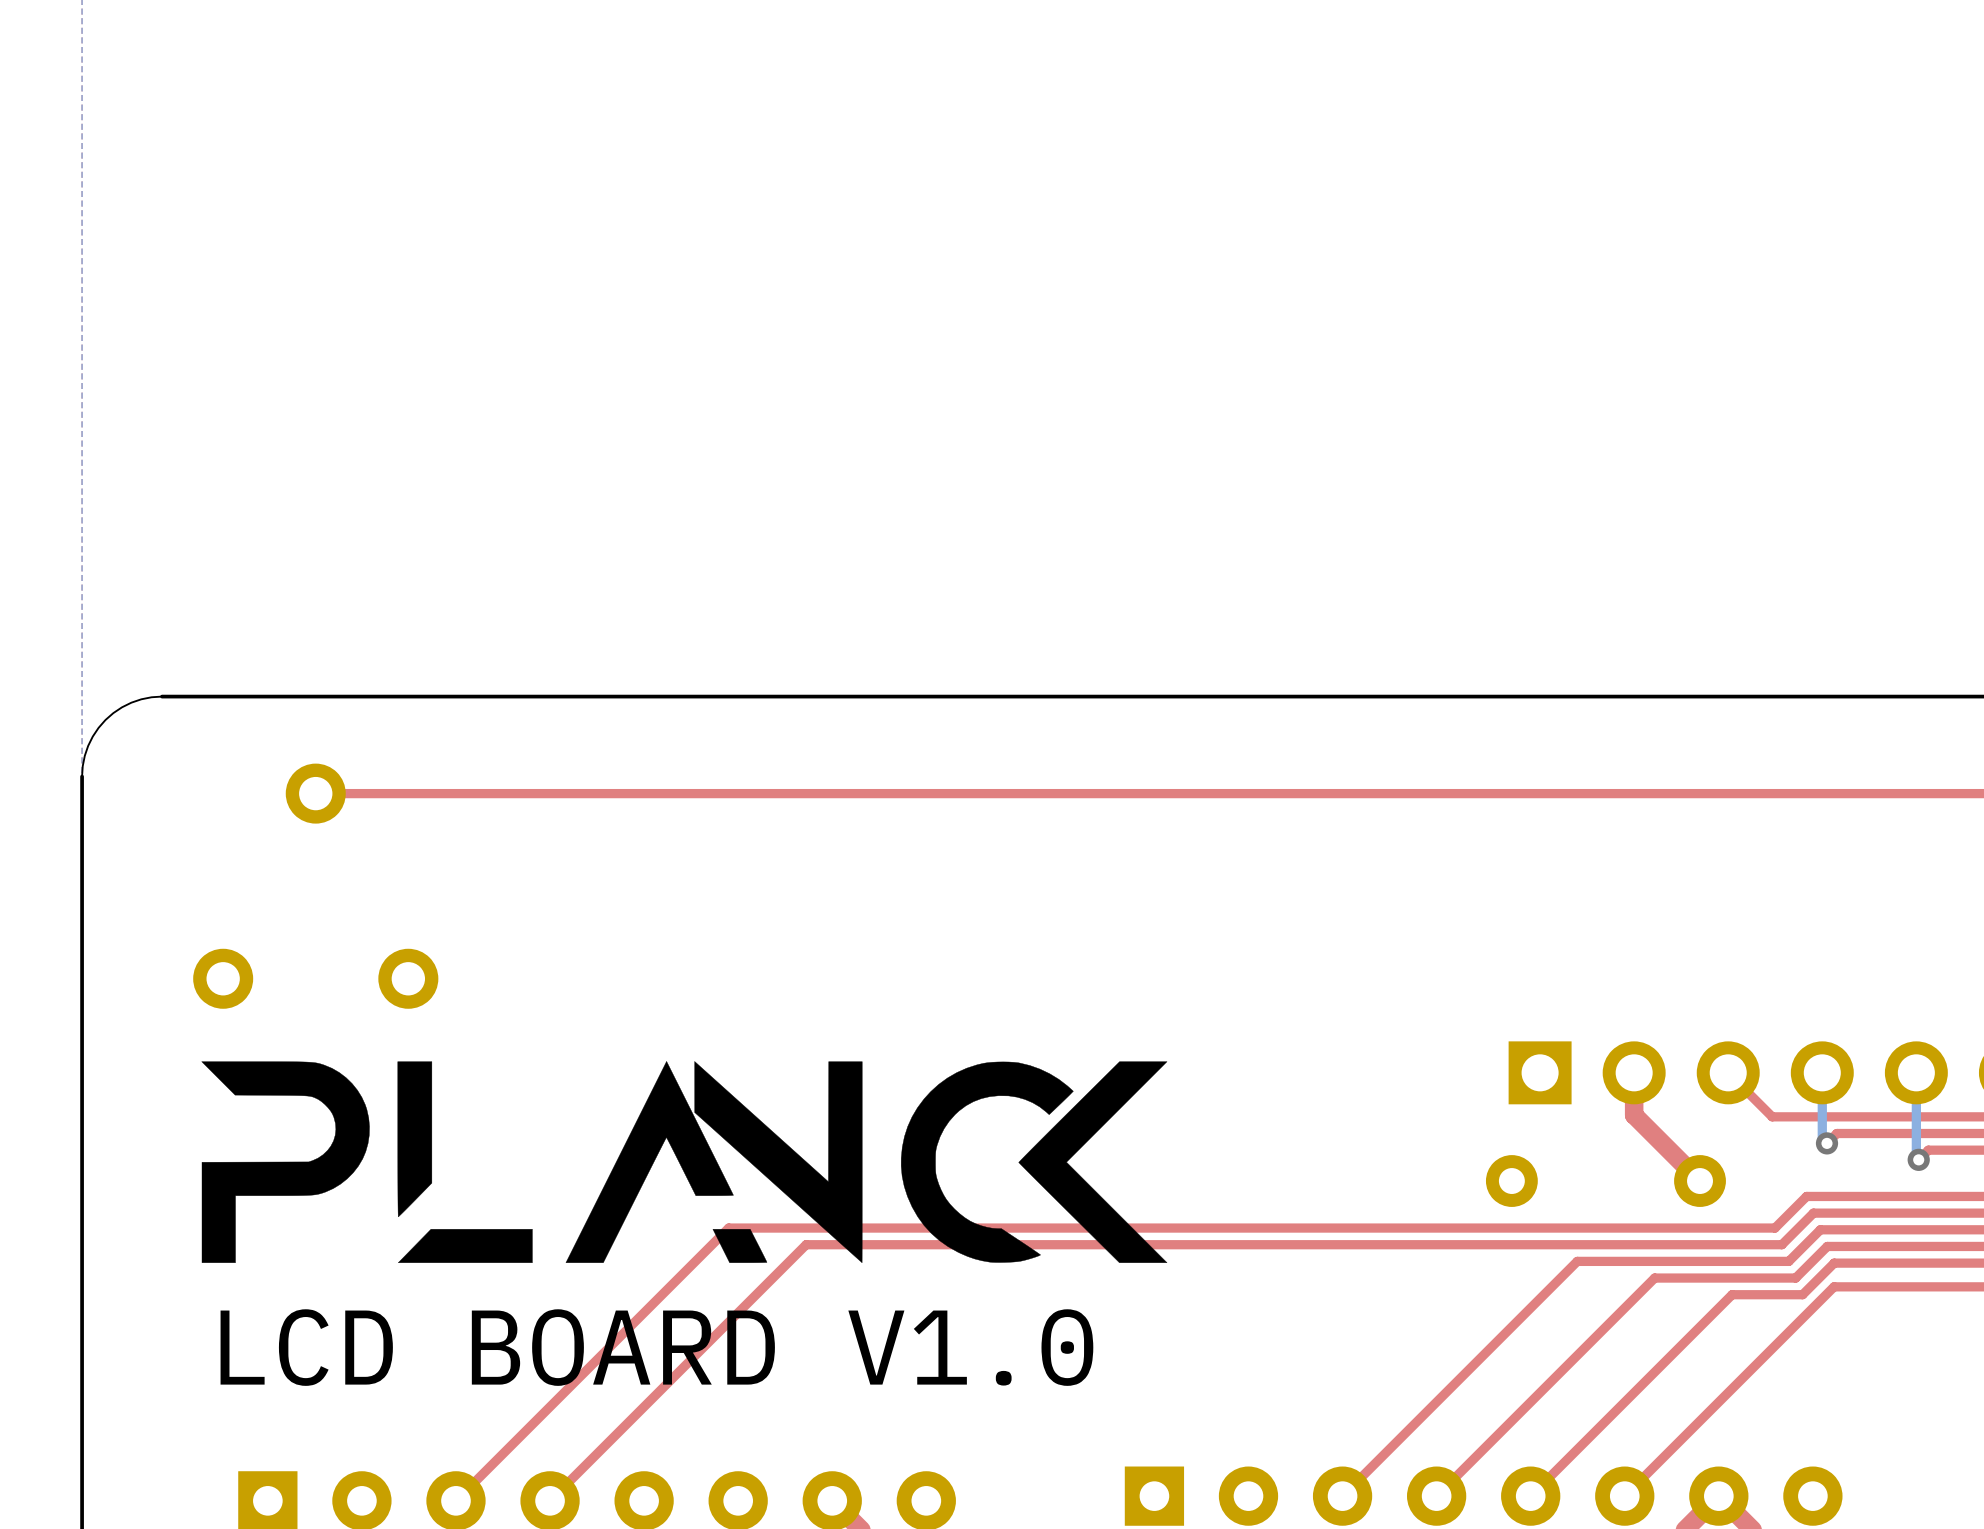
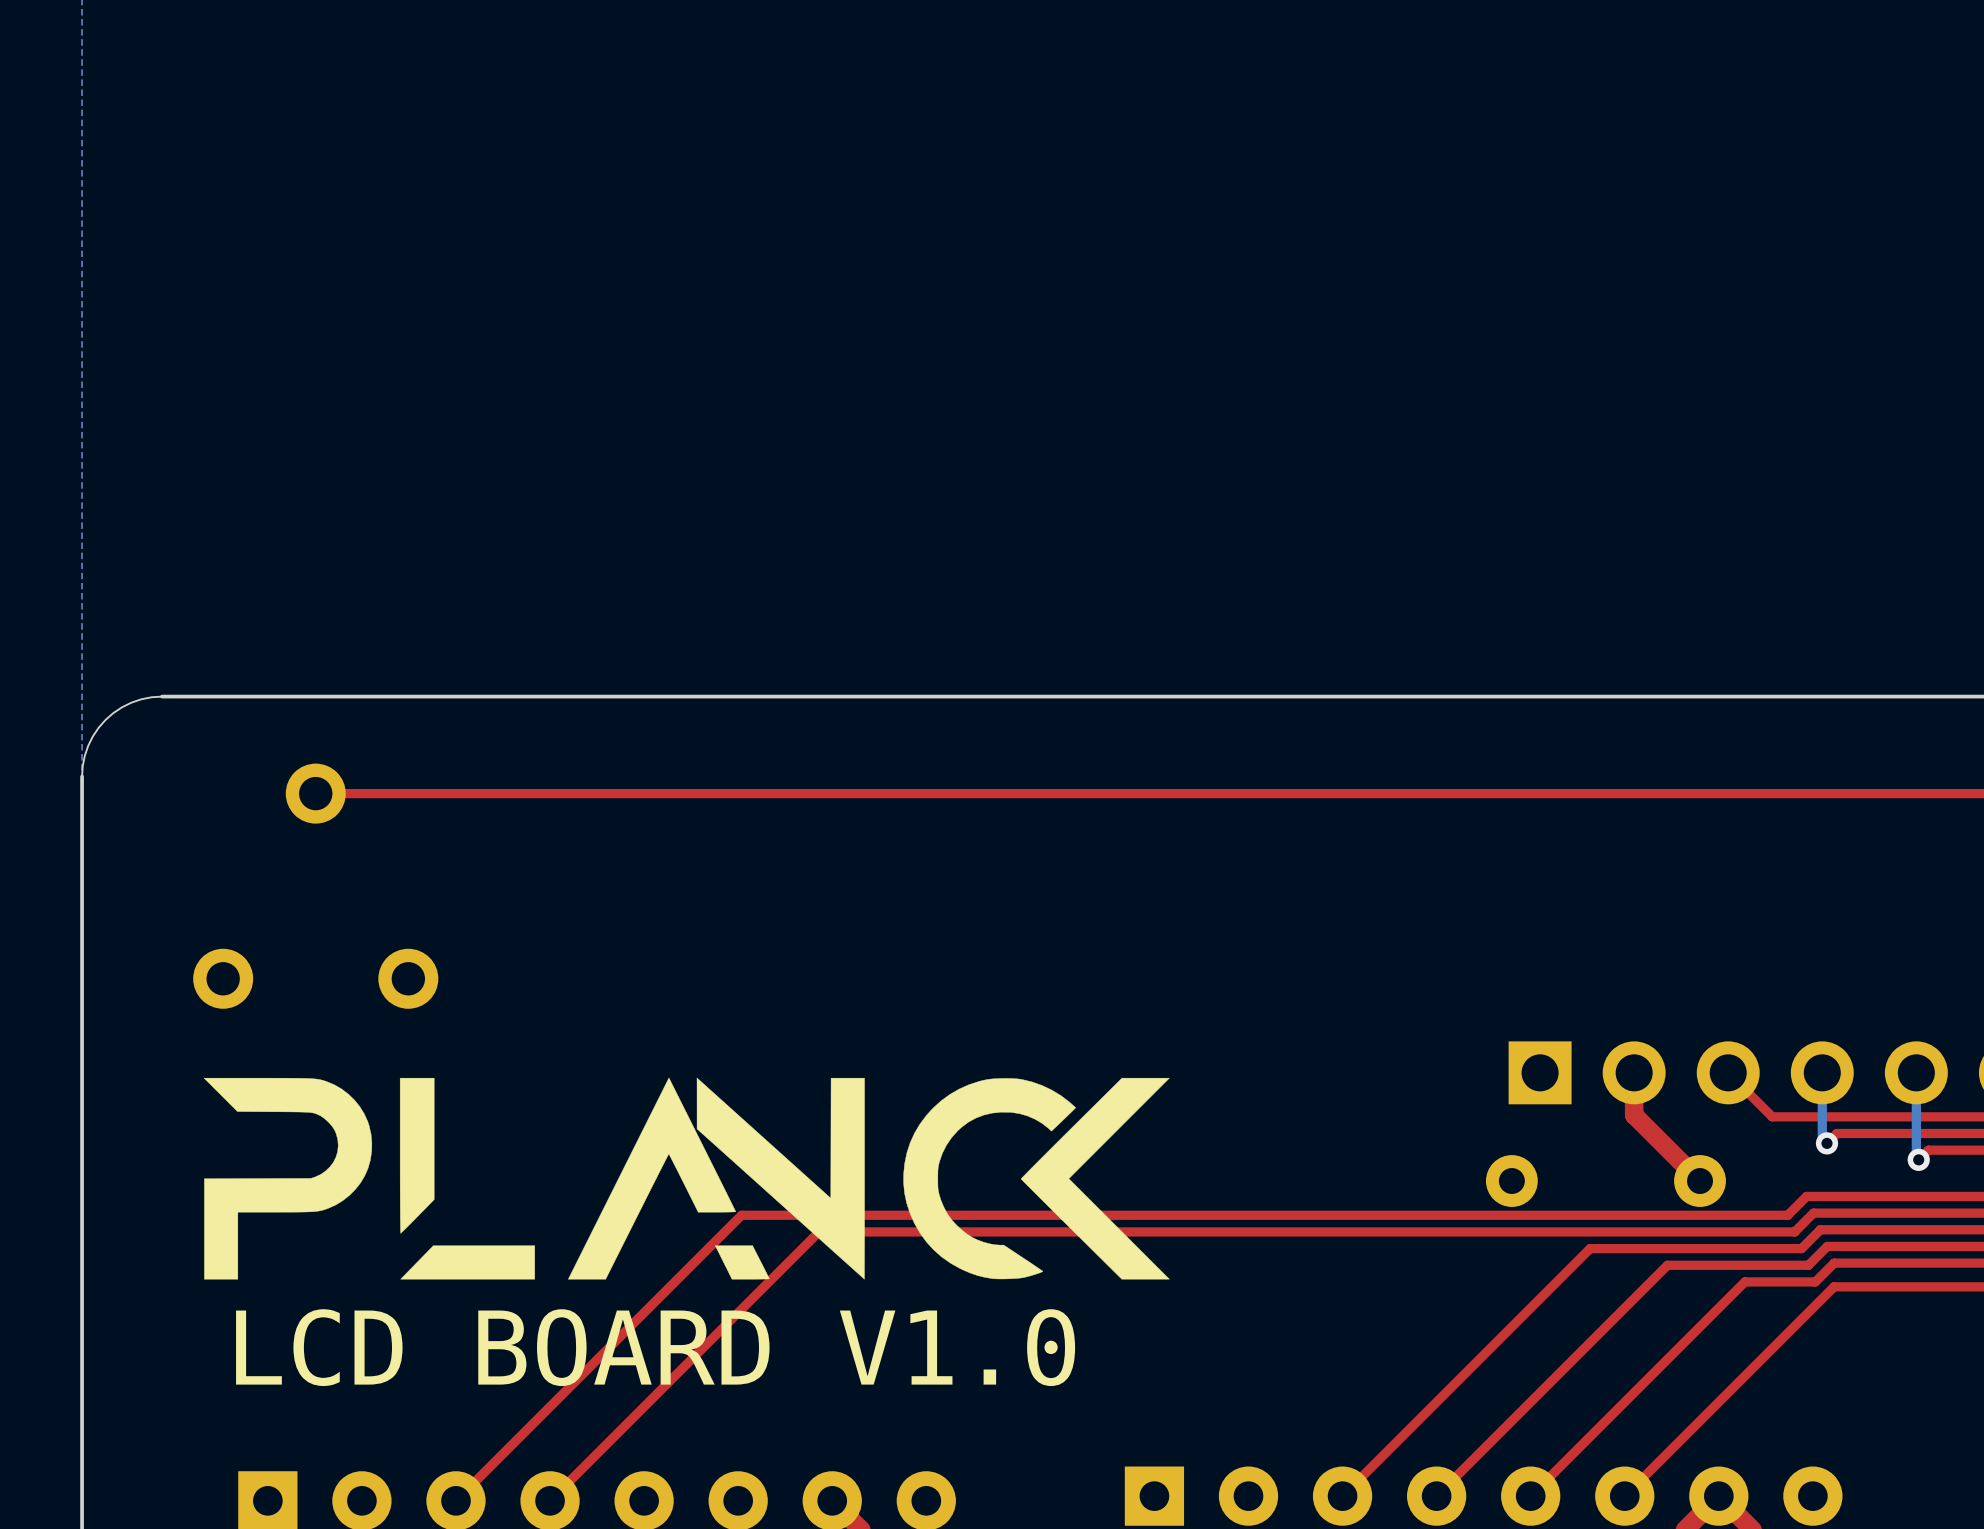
drawing position: (684, 1162) -> (686, 1178)
top track: (1787, 1215) (1775, 1228) (728, 1228) -> (1787, 1215) (741, 1215) (728, 1228)
top track: (1794, 1231) (1781, 1244) (806, 1244) -> (1794, 1231) (818, 1231) (806, 1244)
top track: (1801, 1248) (1788, 1261) (1577, 1261) -> (1801, 1248) (1590, 1248) (1577, 1261)
top track: (1808, 1265) (1795, 1278) (1654, 1278) -> (1808, 1265) (1667, 1265) (1654, 1278)
top track: (1815, 1281) (1802, 1294) (1732, 1294) -> (1815, 1281) (1744, 1281) (1732, 1294)

